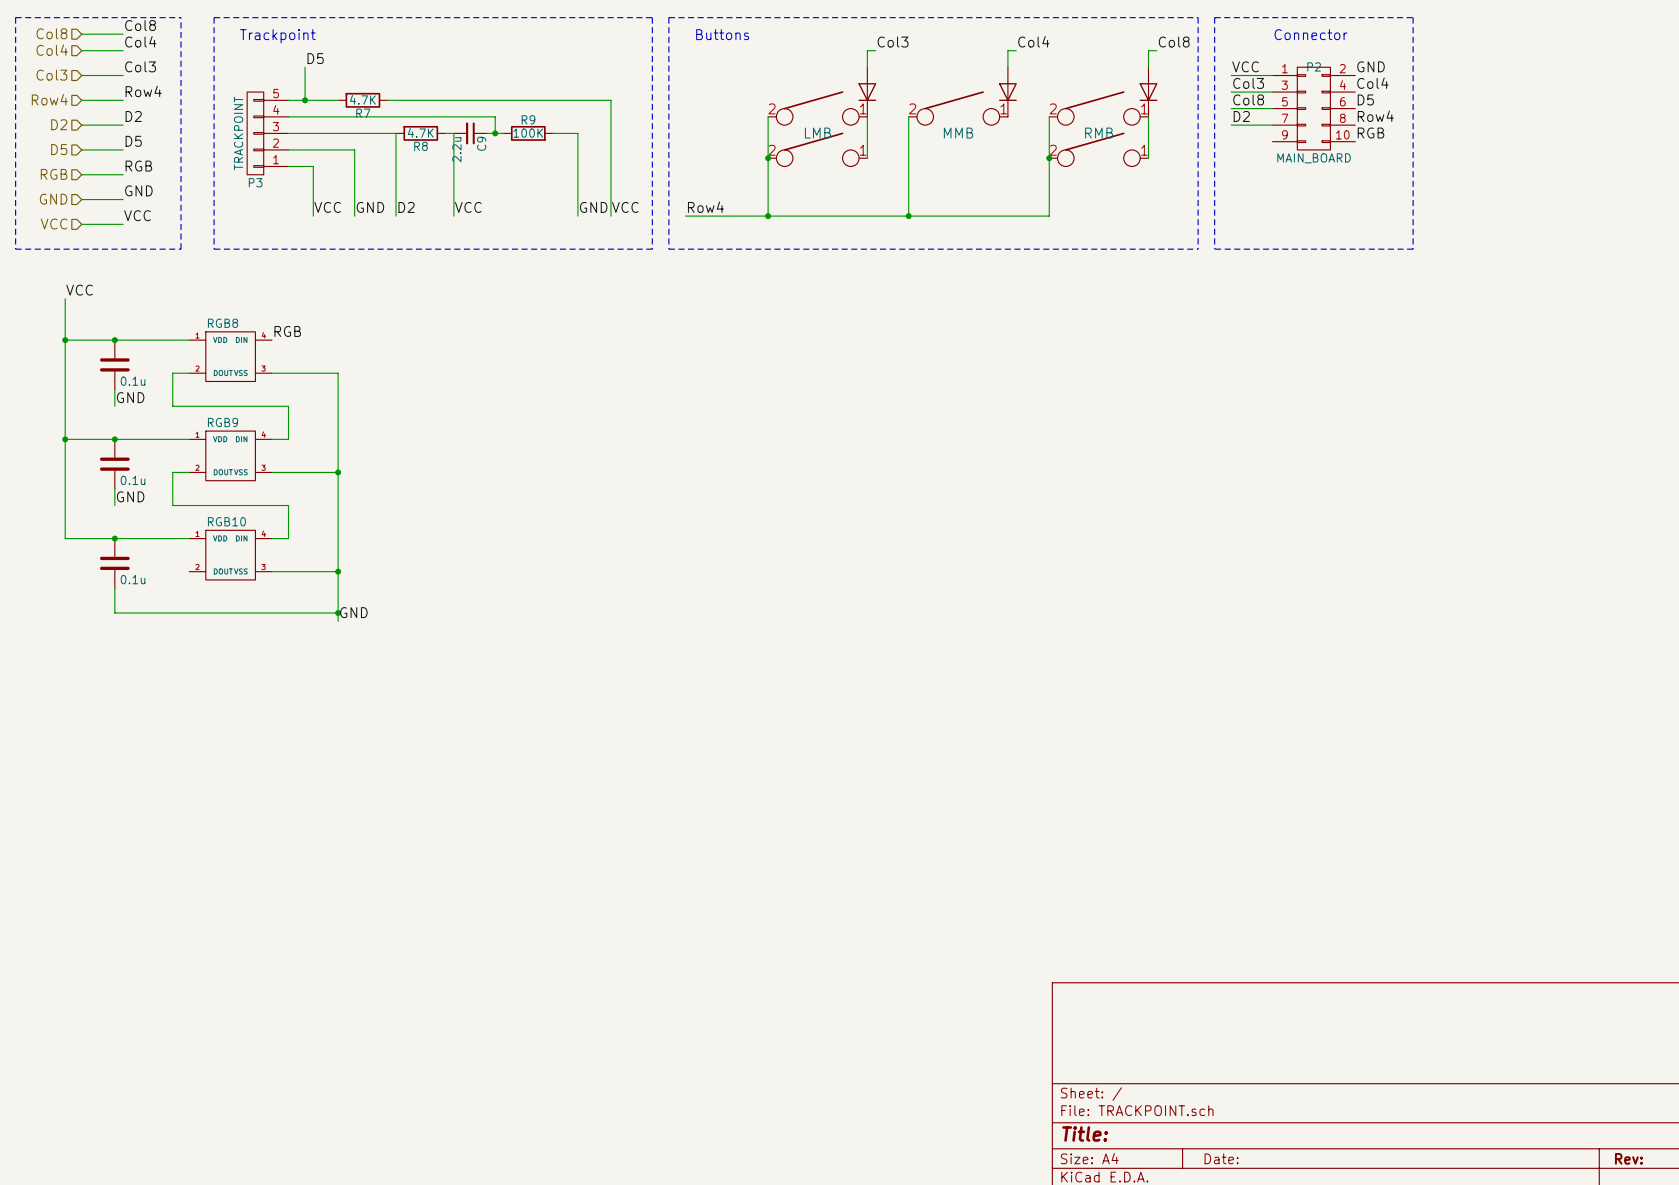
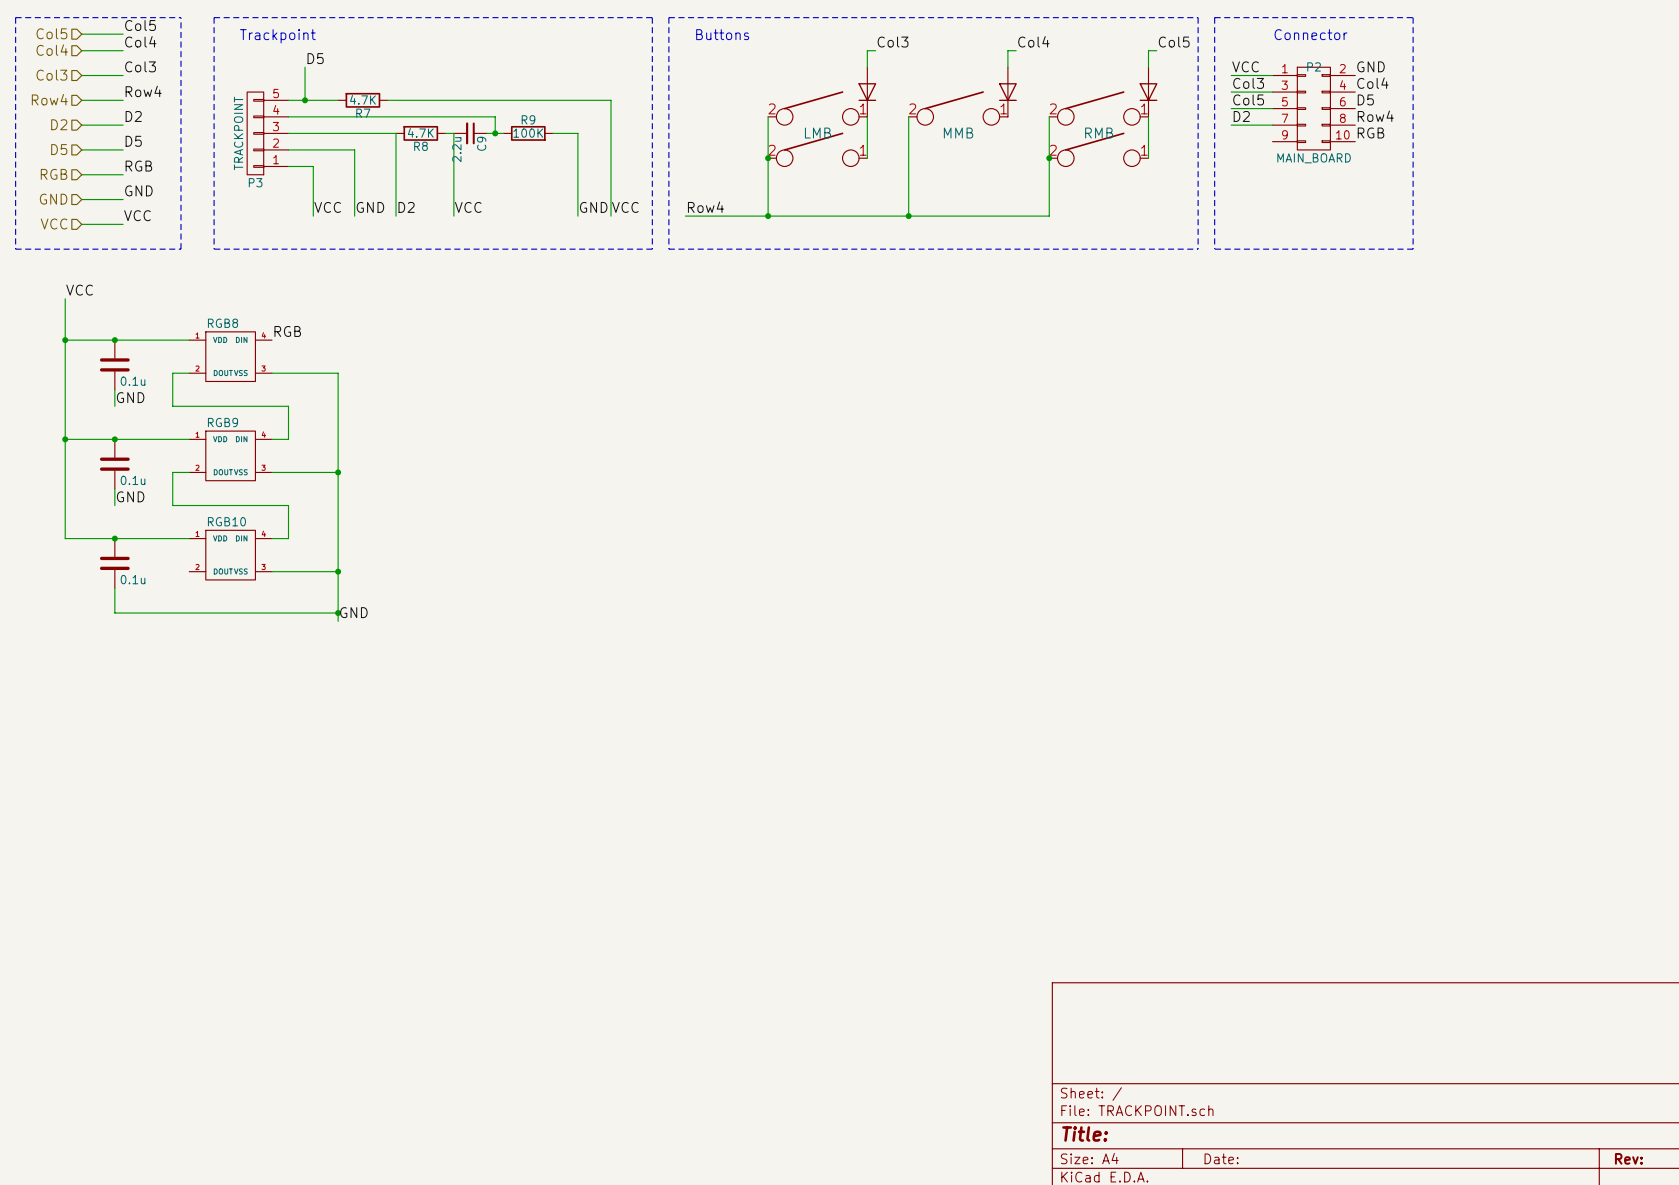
label: Col8 (140, 25) -> Col5 (140, 25)
hierarchical label: Col8 (51, 33) -> Col5 (51, 33)
label: Col8 (1174, 42) -> Col5 (1174, 42)
label: Col8 (1248, 99) -> Col5 (1248, 99)

